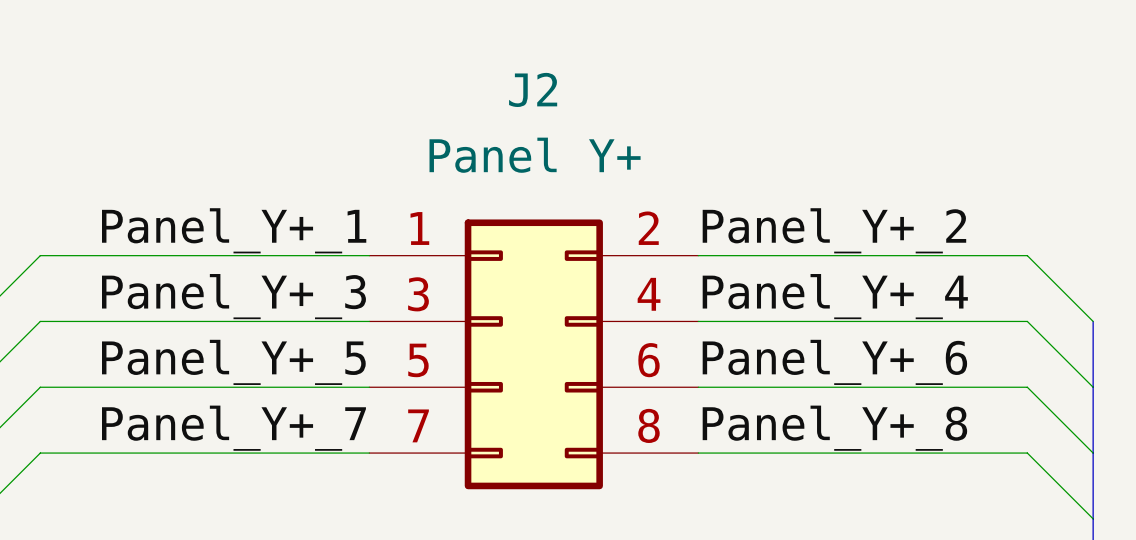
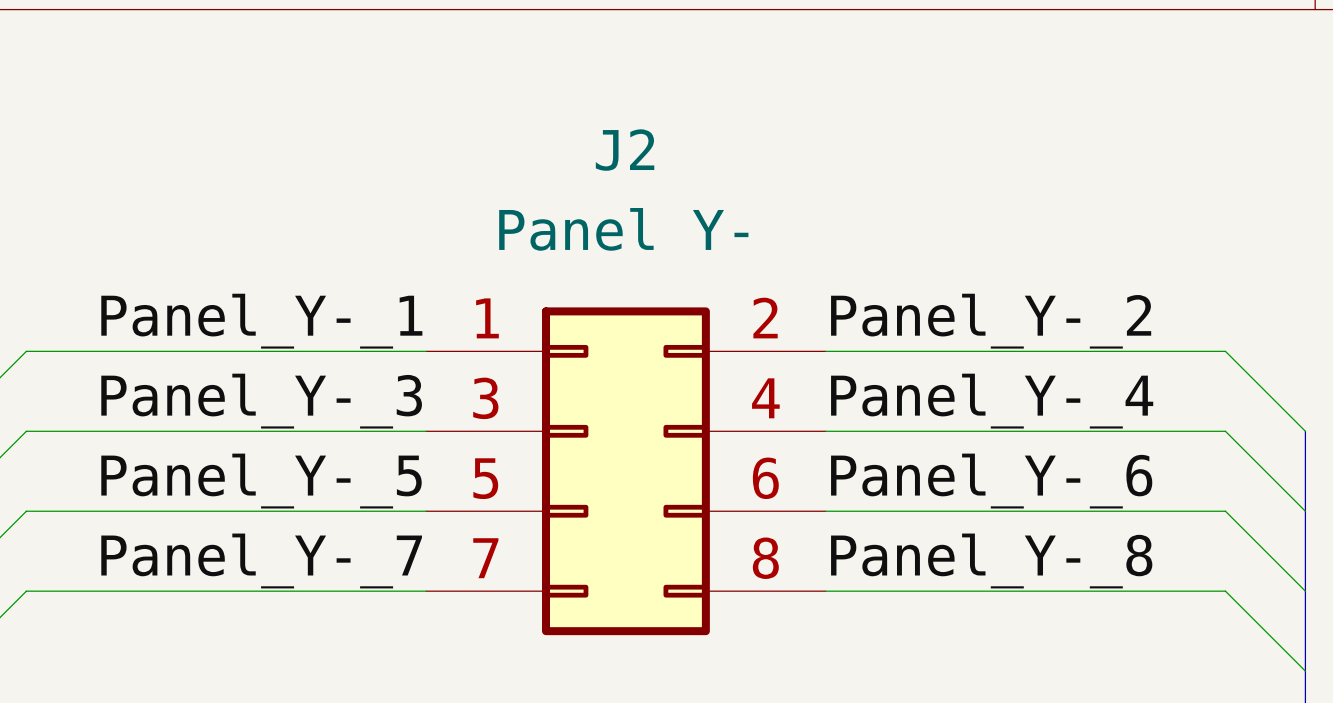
J2 value: Panel Y+ (535, 155) -> Panel Y- (623, 229)
label: Panel_Y+_1 (234, 230) -> Panel_Y-_1 (261, 321)
label: Panel_Y+_2 (834, 230) -> Panel_Y-_2 (991, 321)
label: Panel_Y+_3 (233, 296) -> Panel_Y-_3 (261, 401)
label: Panel_Y+_4 (835, 296) -> Panel_Y-_4 (992, 401)
label: Panel_Y+_5 (233, 362) -> Panel_Y-_5 (261, 481)
label: Panel_Y+_6 (834, 362) -> Panel_Y-_6 (991, 481)
label: Panel_Y+_7 (233, 428) -> Panel_Y-_7 (261, 560)
label: Panel_Y+_8 (834, 428) -> Panel_Y-_8 (991, 560)

